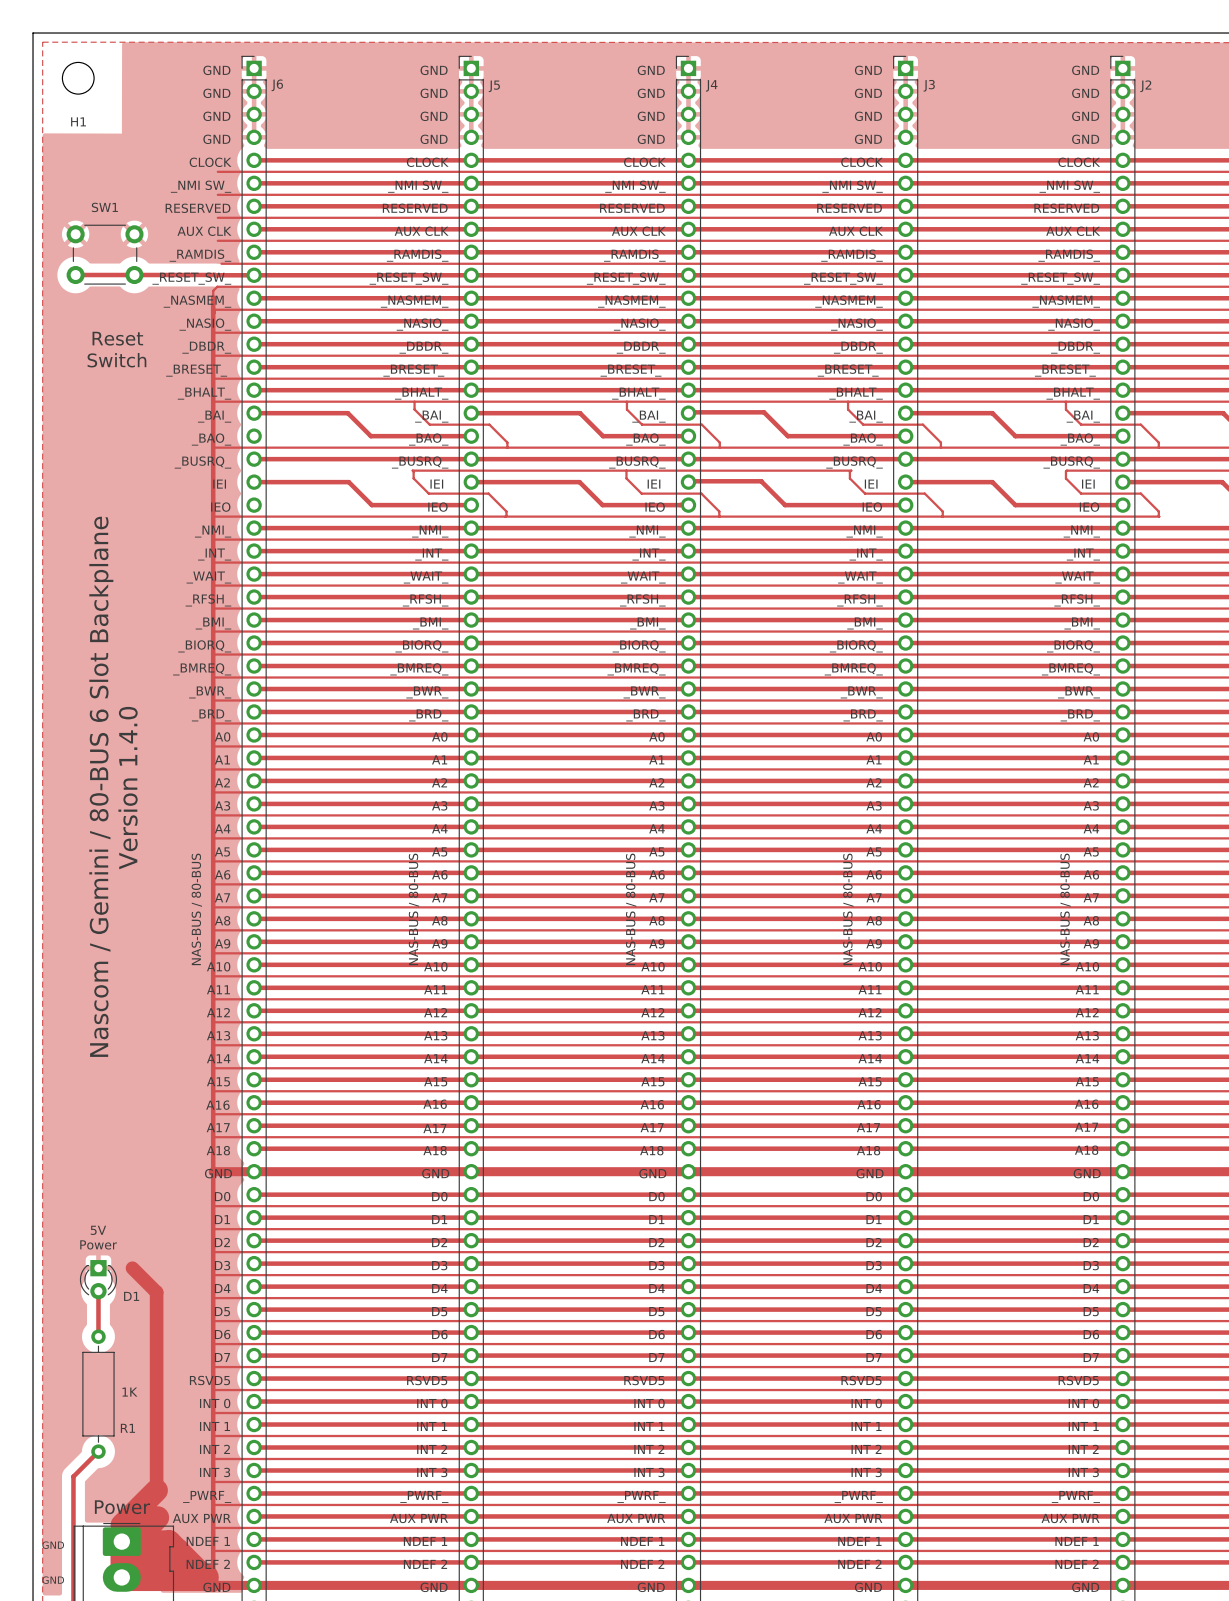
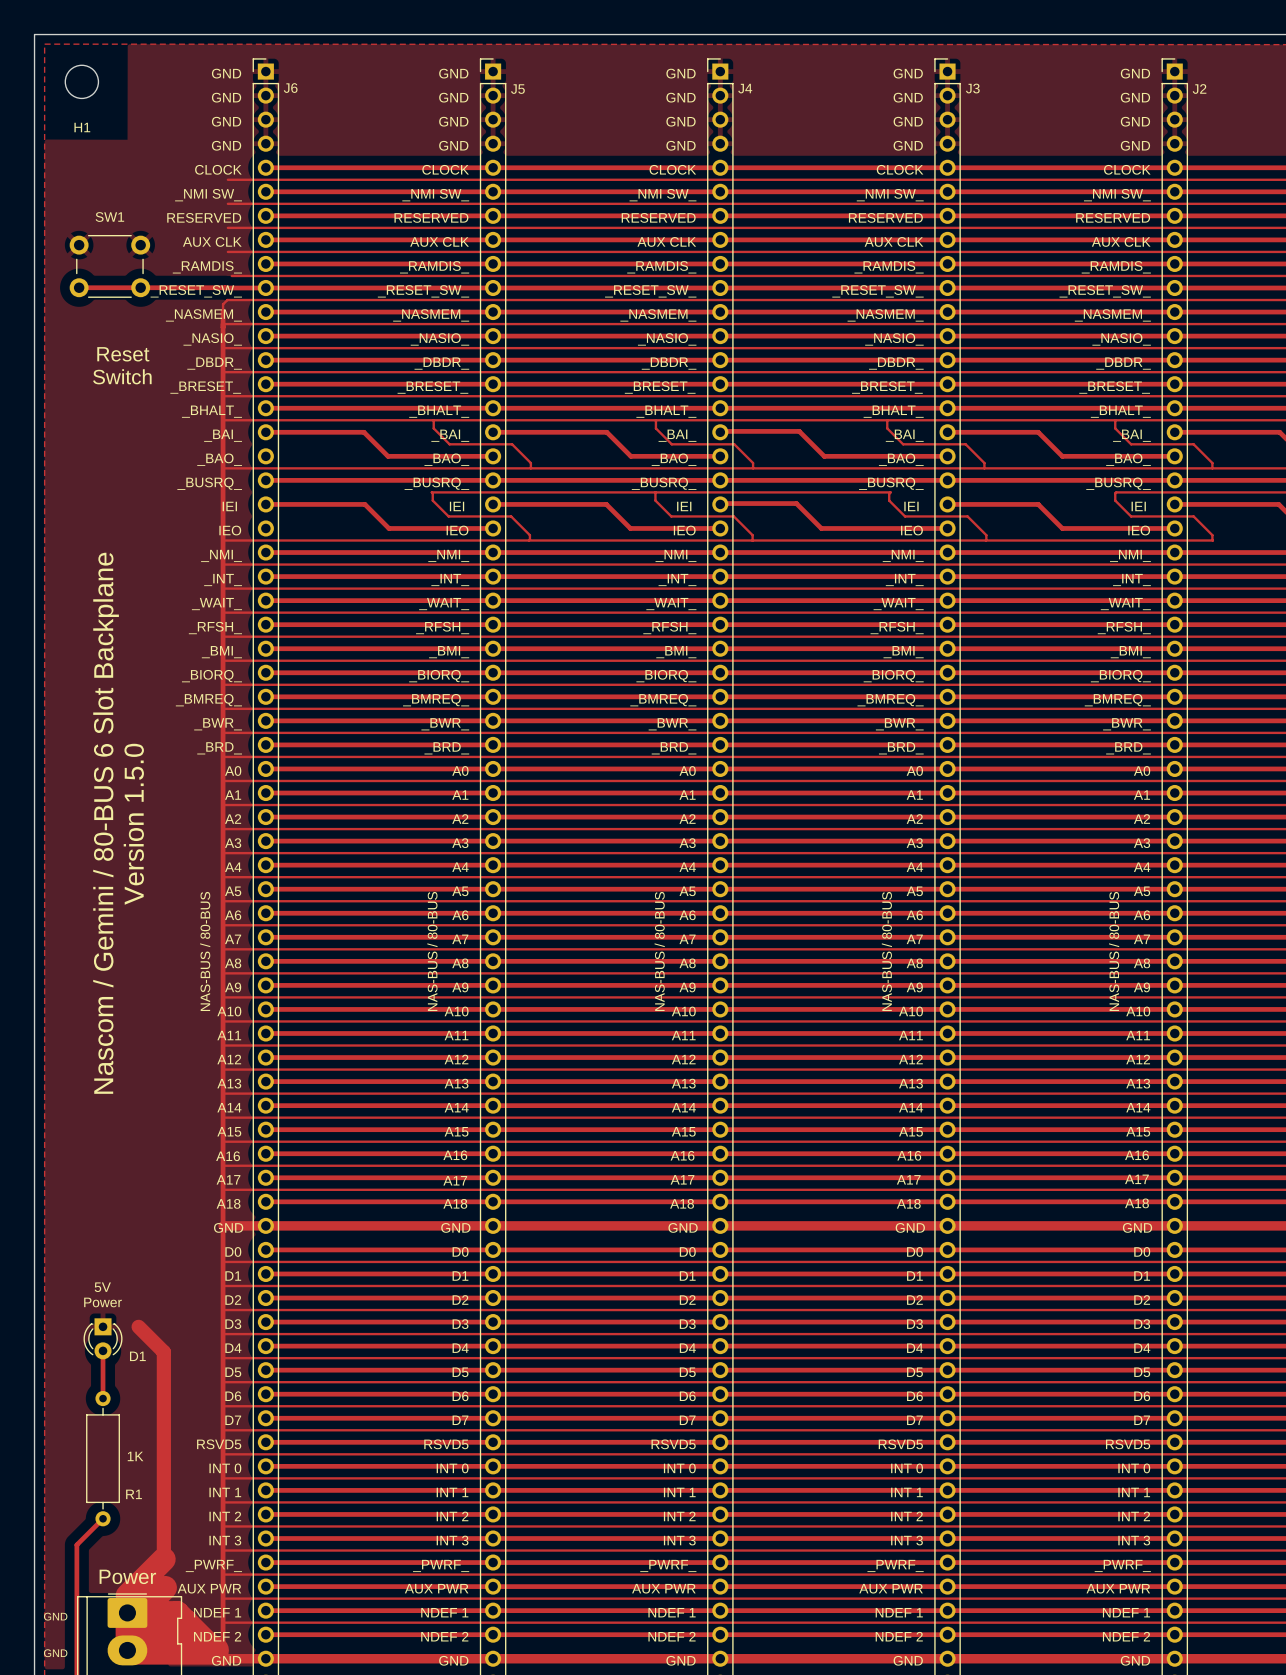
text: Version 1.4.0 (128, 788) -> Version 1.5.0 (133, 824)

